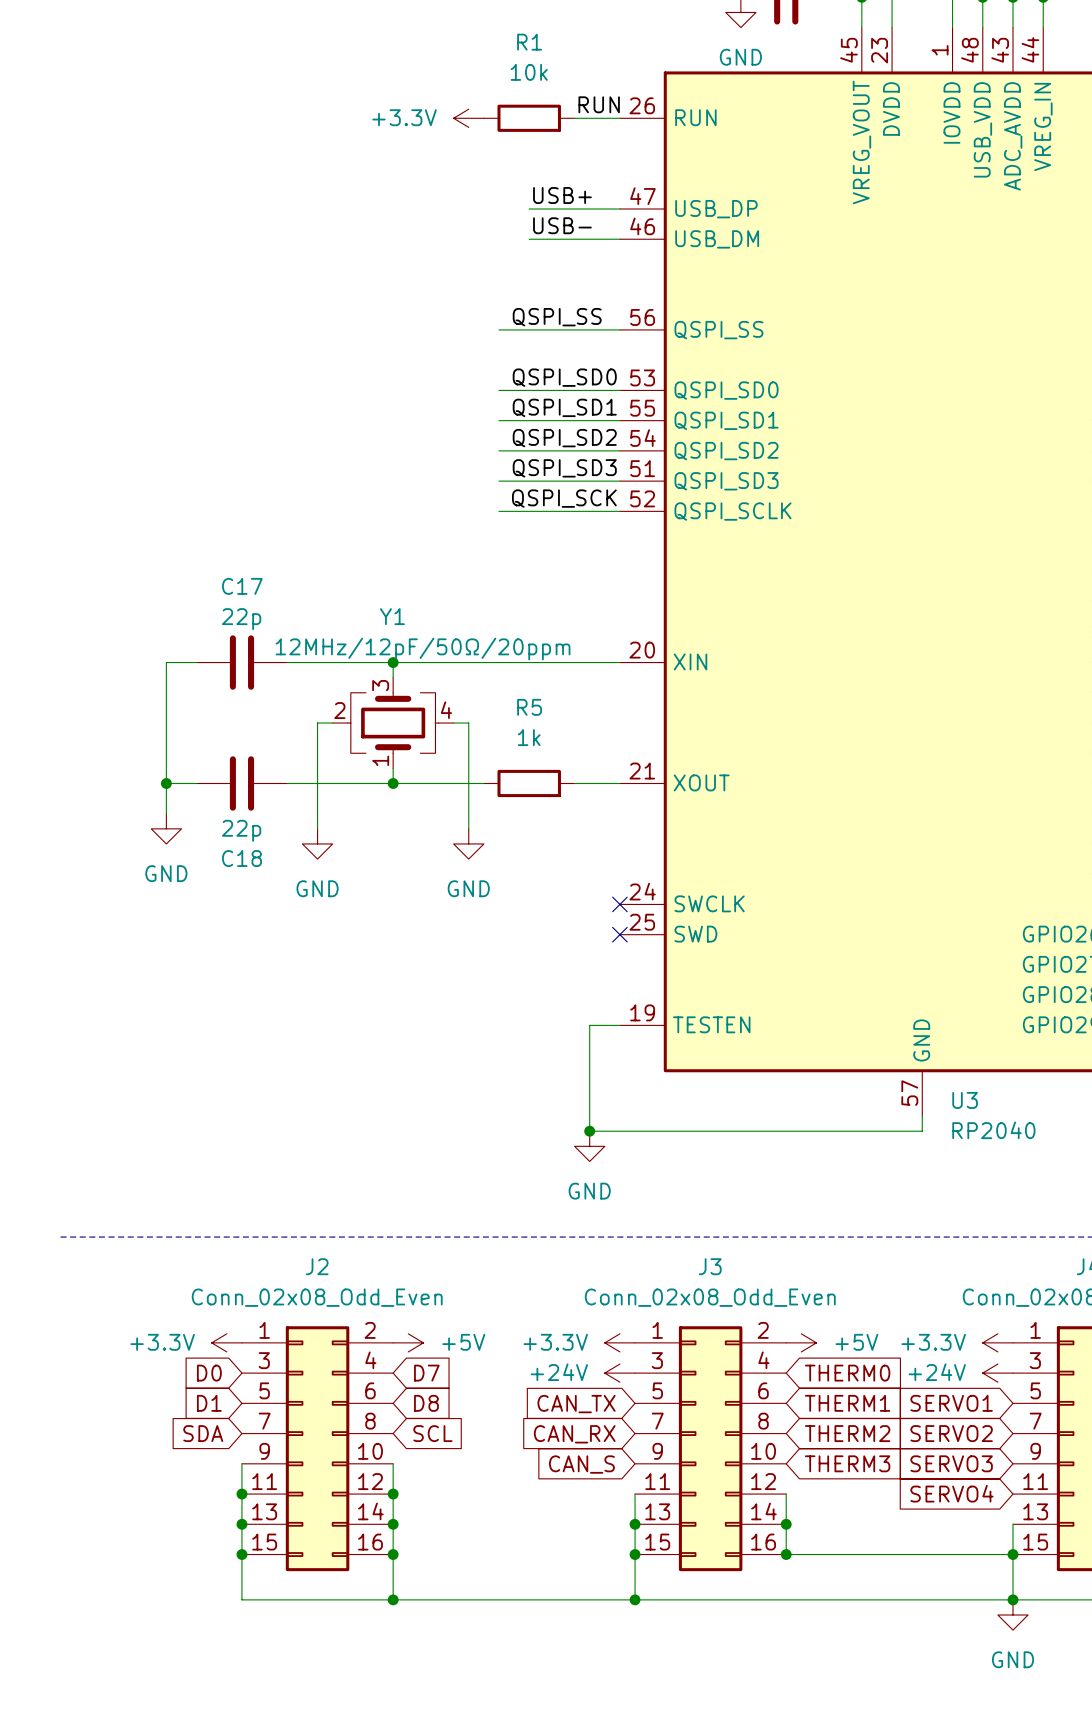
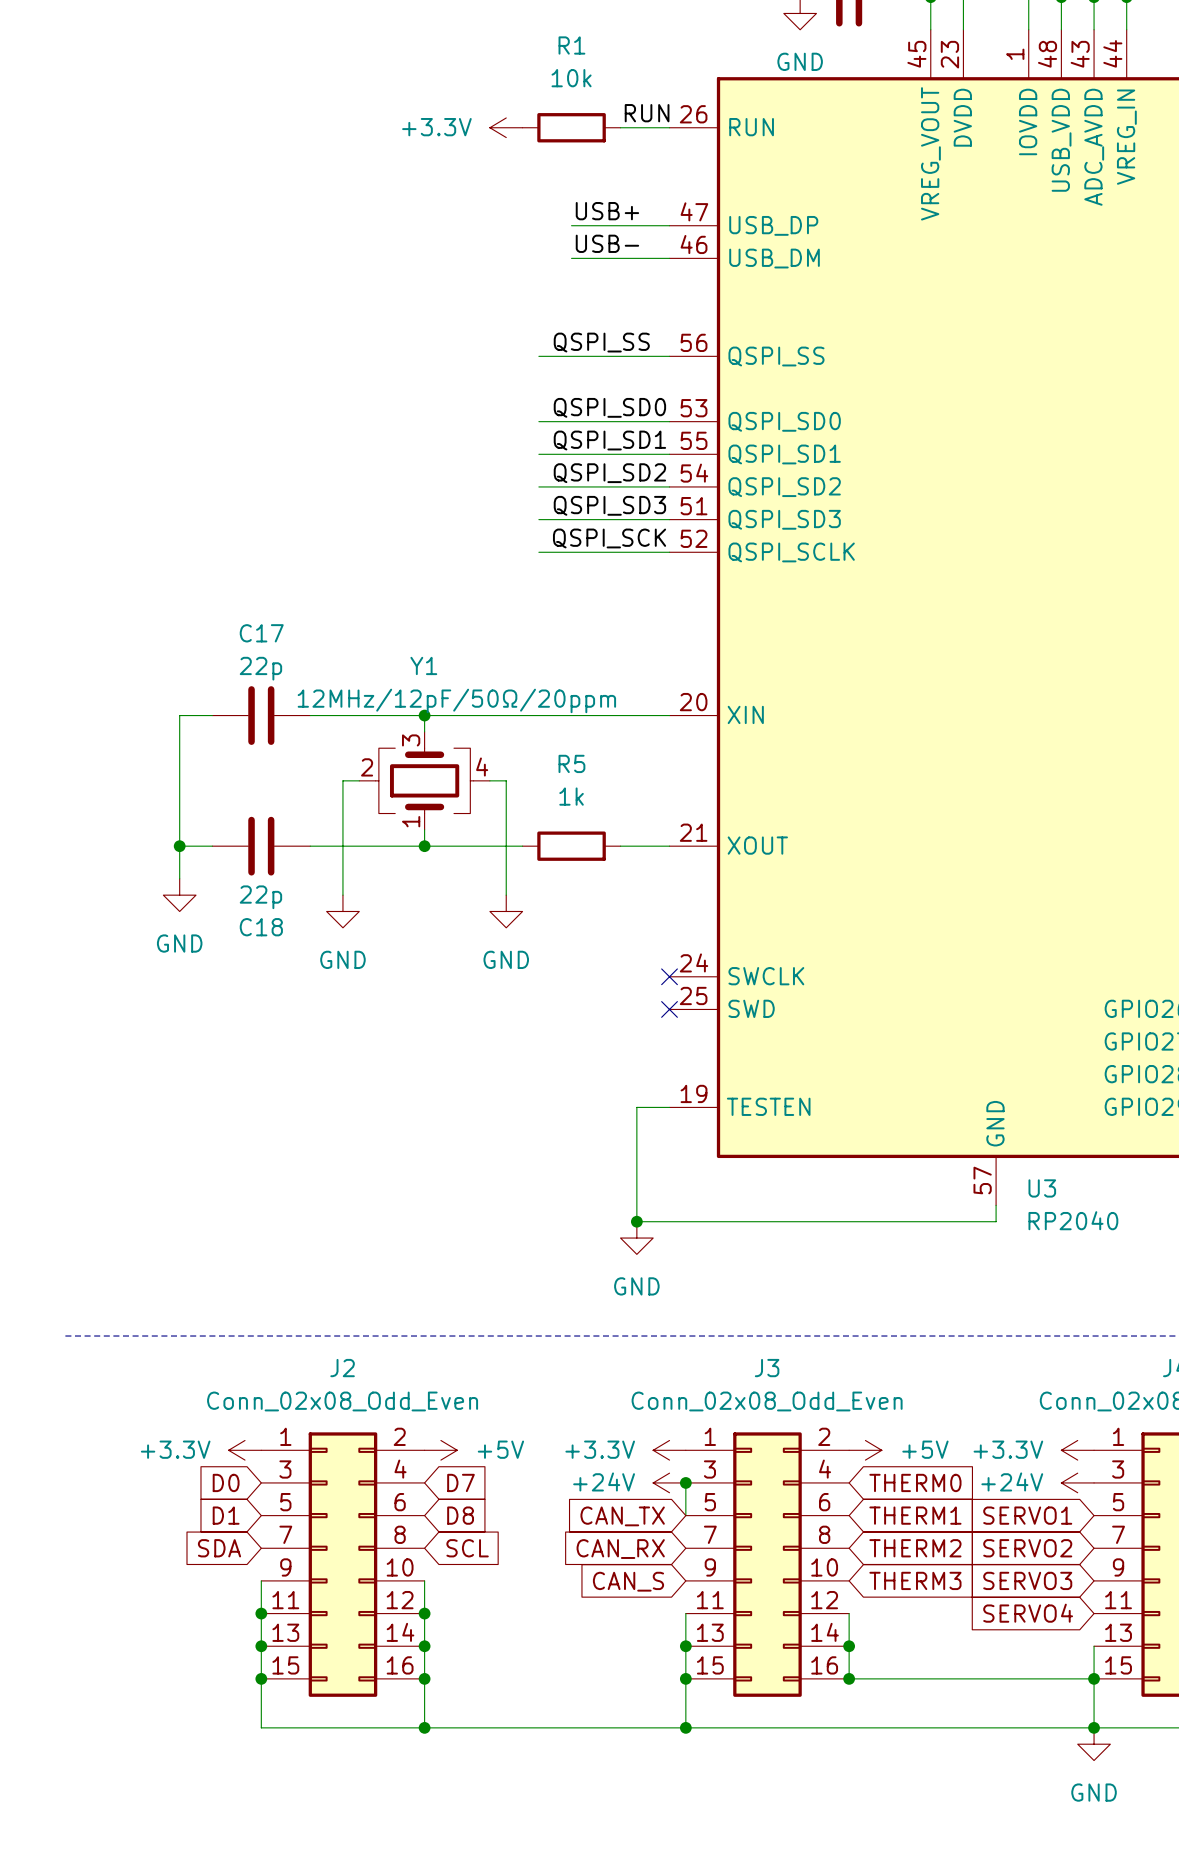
wire: none -> (685, 1482) (685, 1515)
junction: none -> (685, 1482)

